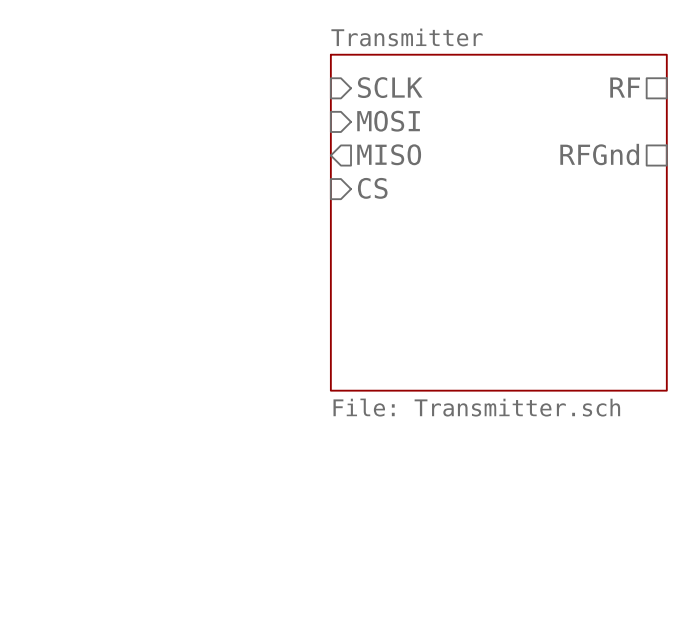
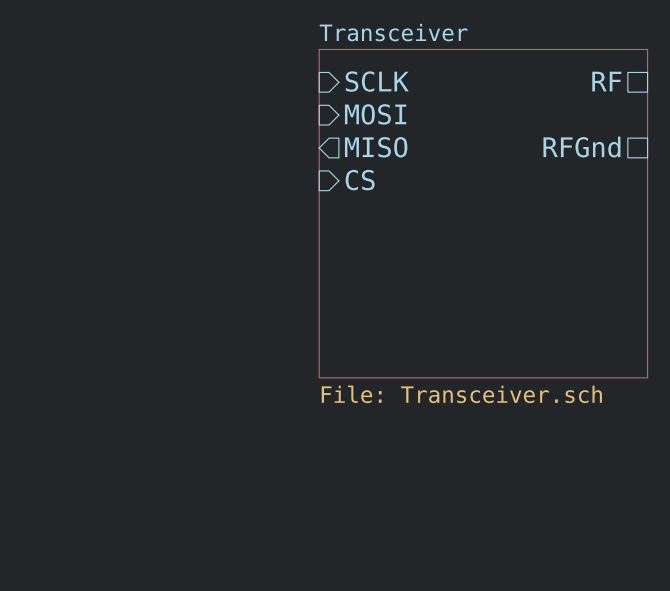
sheet Transmitter name: Transmitter (406, 37) -> Transceiver (393, 32)
sheet Transmitter value: File: Transmitter.sch (476, 407) -> File: Transceiver.sch (461, 394)

